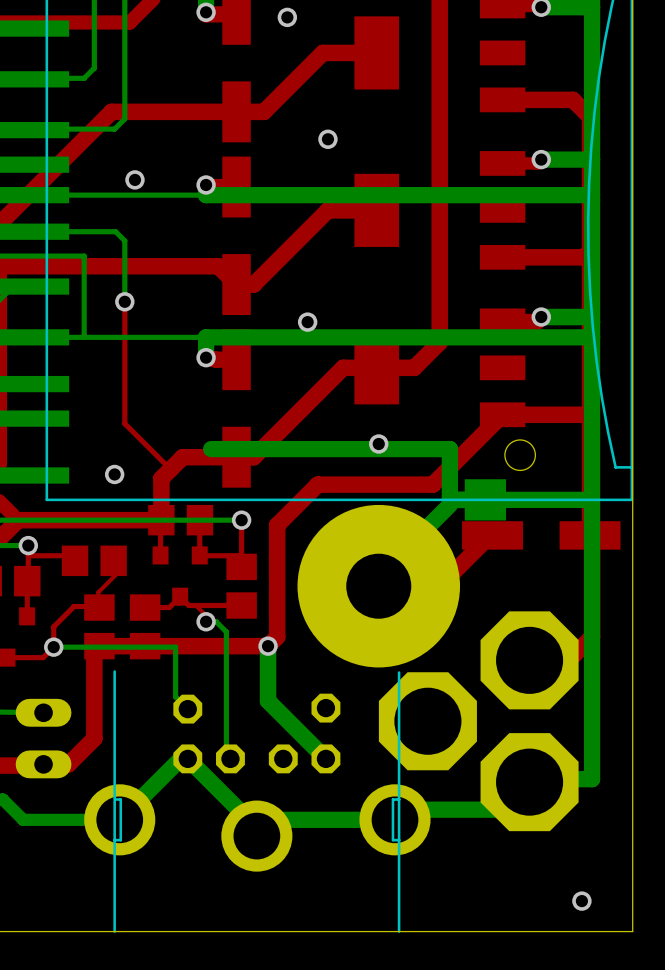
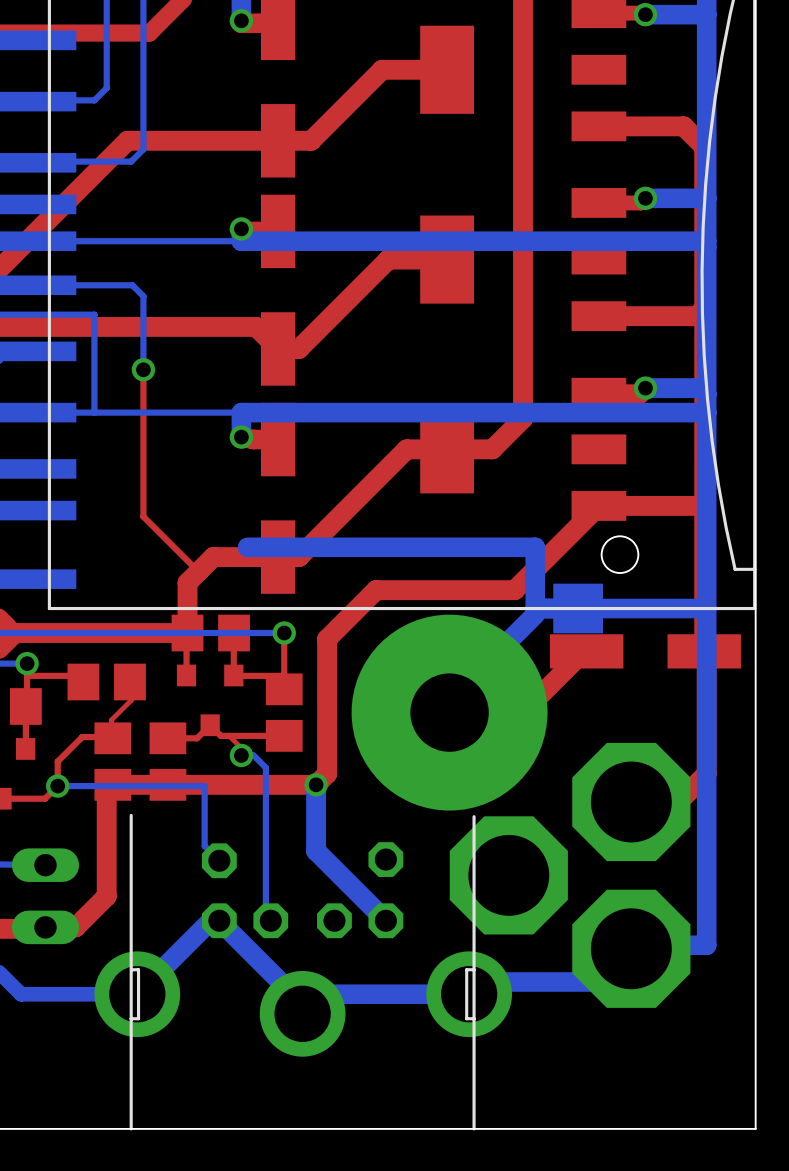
via: (287, 17) -> none
via: (327, 139) -> none
via: (134, 179) -> none
via: (307, 322) -> none
via: (378, 444) -> none
via: (114, 474) -> none
via: (581, 901) -> none

